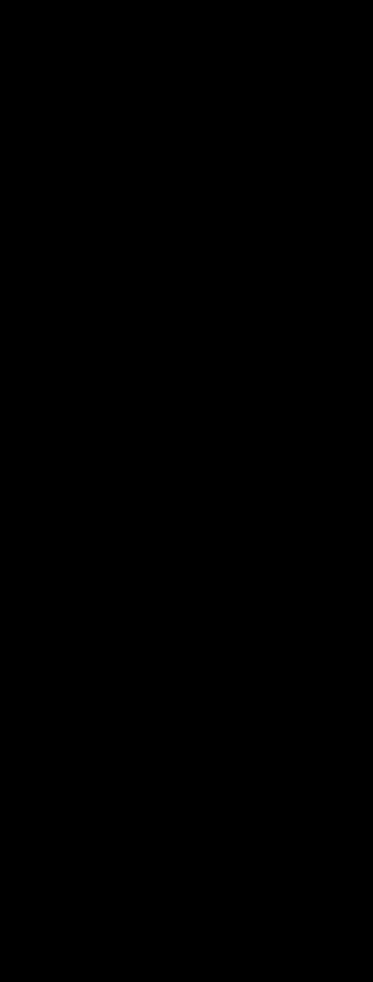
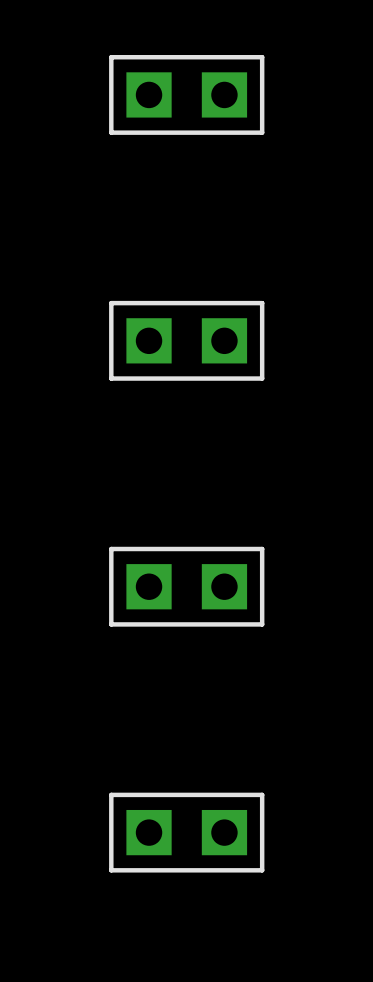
part: none -> (186, 94)
part: none -> (186, 340)
part: none -> (186, 586)
part: none -> (186, 832)

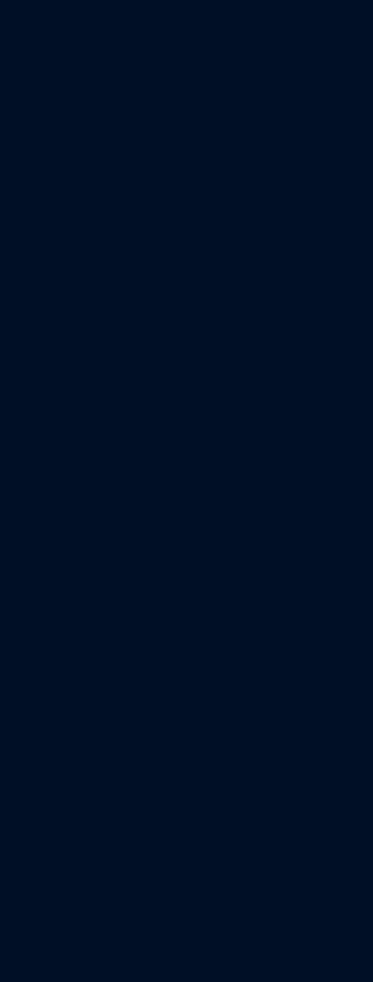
part: (186, 94) -> none
part: (186, 340) -> none
part: (186, 586) -> none
part: (186, 832) -> none

